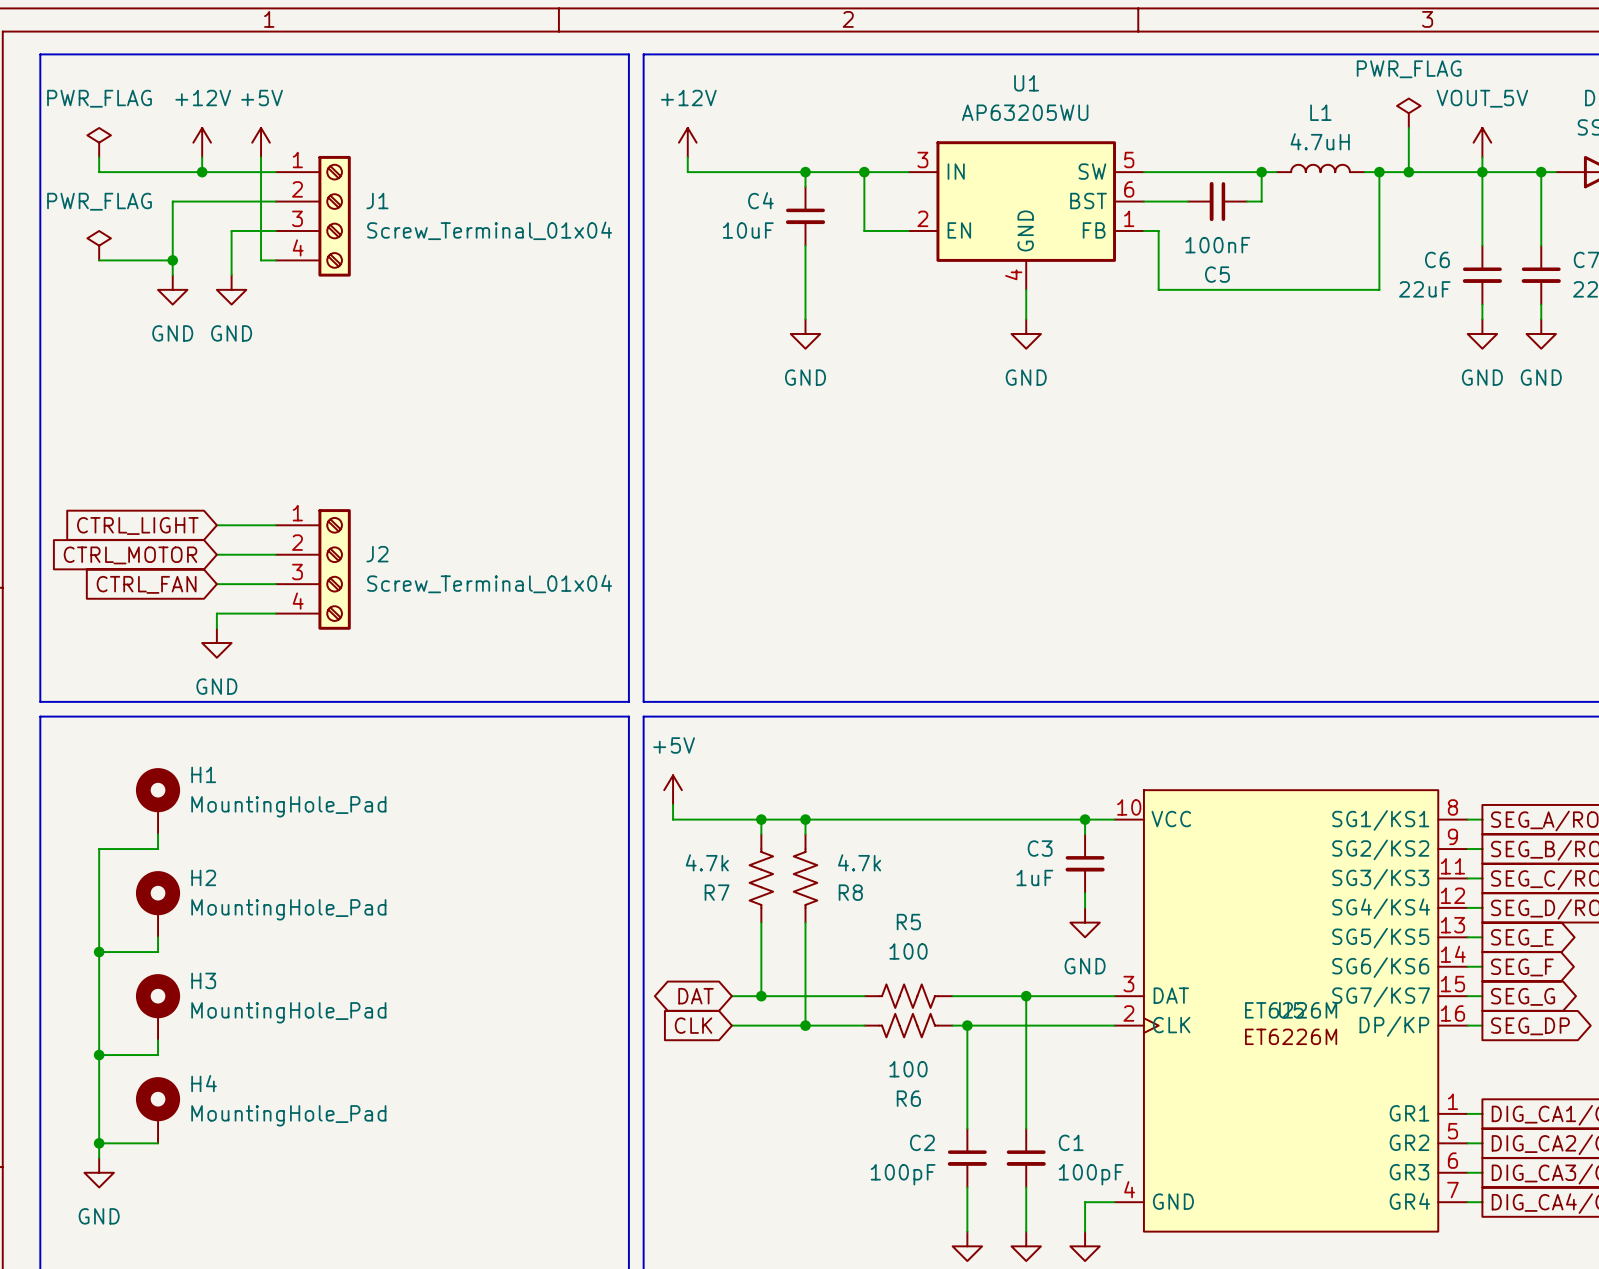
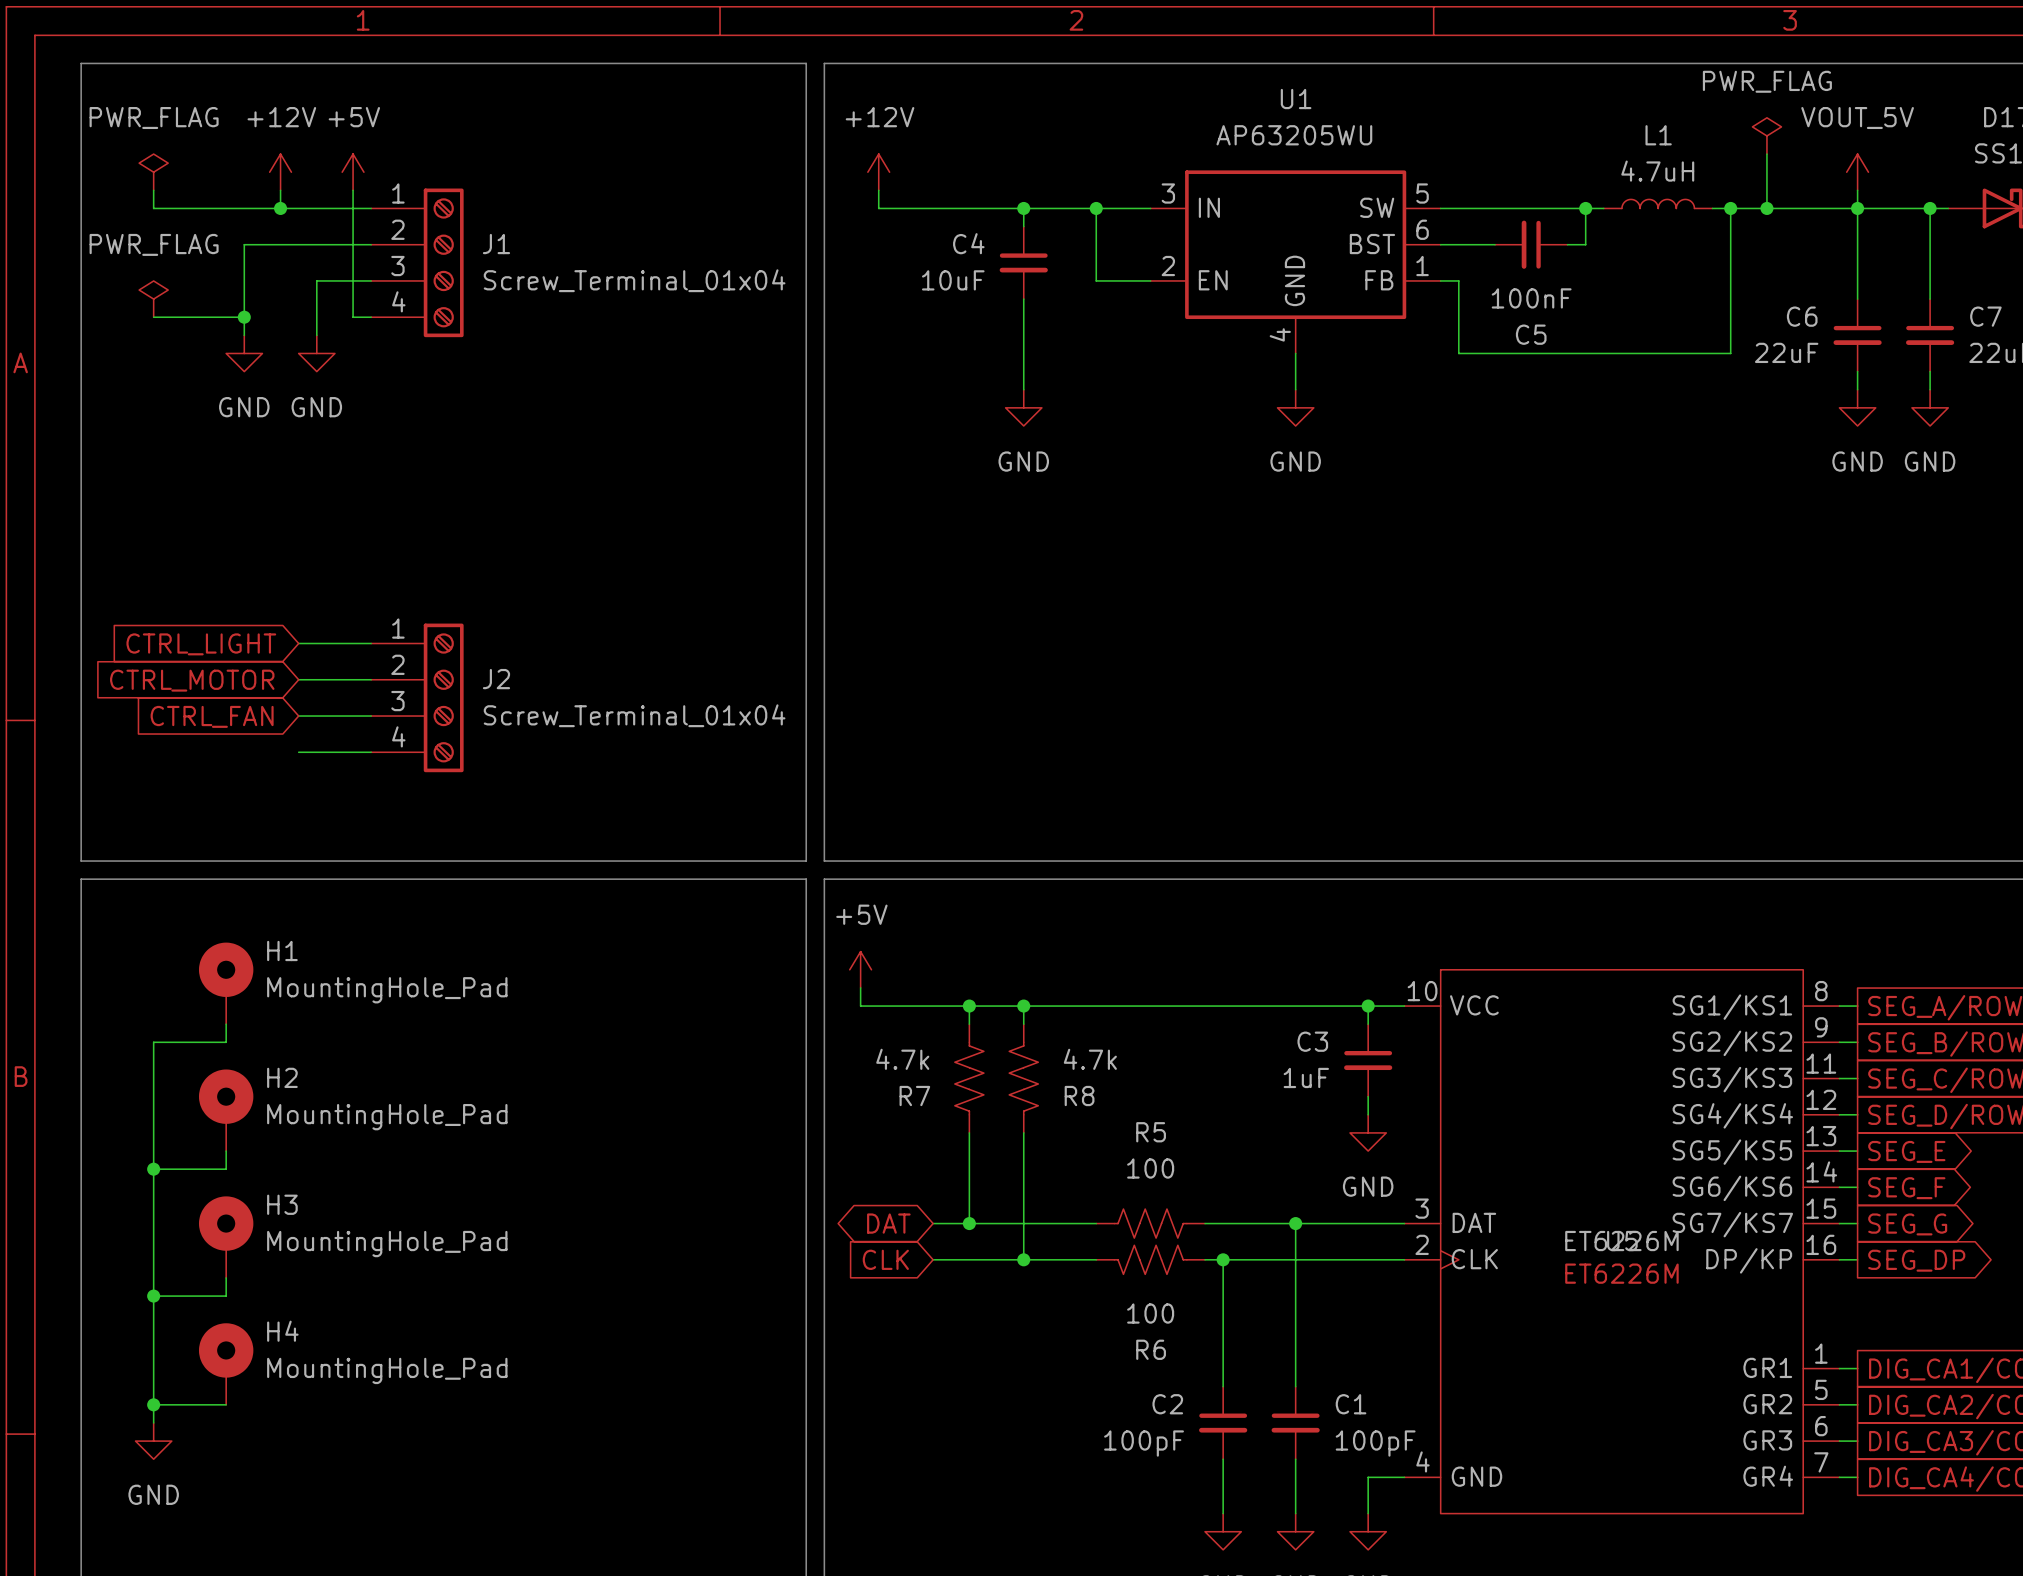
wire: (216, 613) (216, 628) -> none
power symbol: GND (216, 643) -> none

